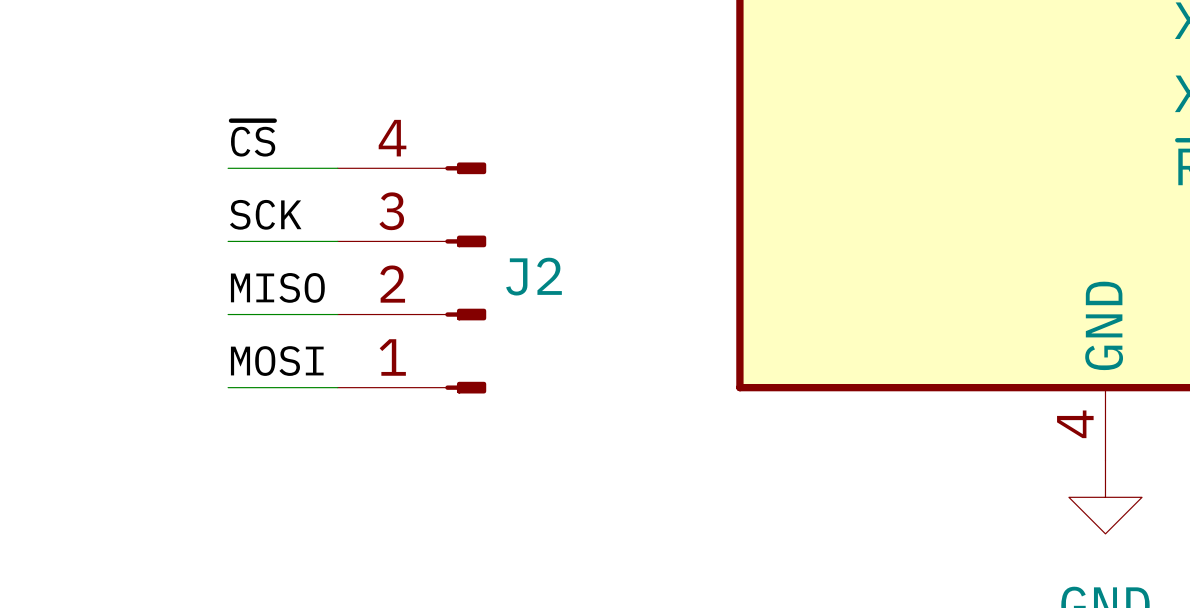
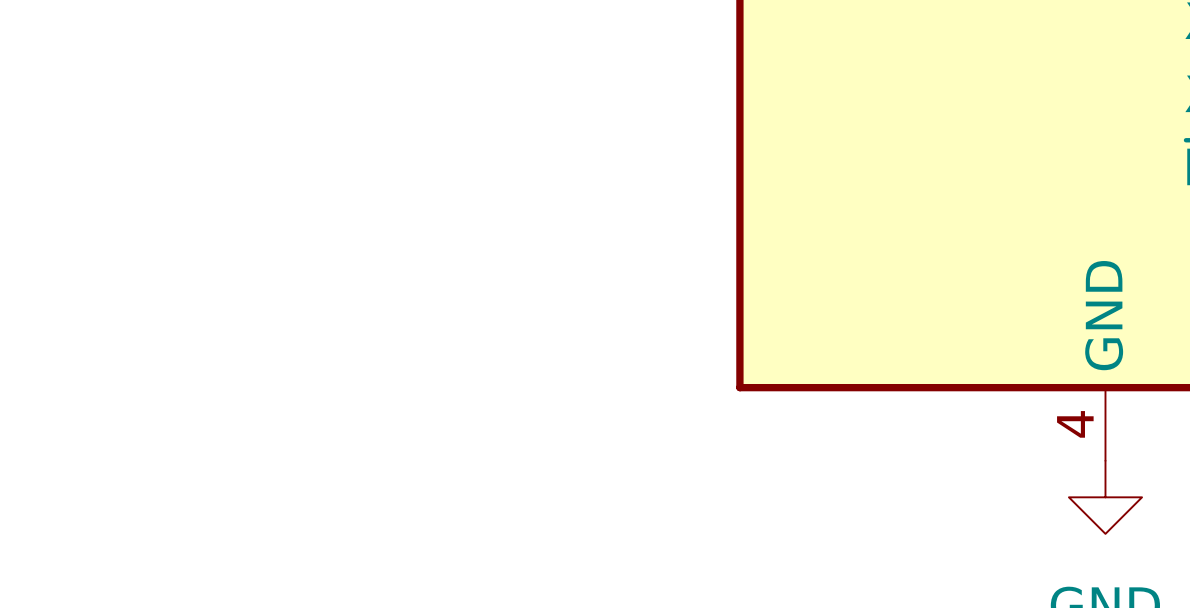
label: ~{CS} (253, 138) -> none
wire: (228, 168) (337, 168) -> none
label: SCK (265, 214) -> none
wire: (228, 241) (337, 241) -> none
J2: (412, 277) -> none
label: MISO (277, 287) -> none
wire: (228, 314) (337, 314) -> none
label: MOSI (277, 361) -> none
wire: (228, 387) (337, 387) -> none

